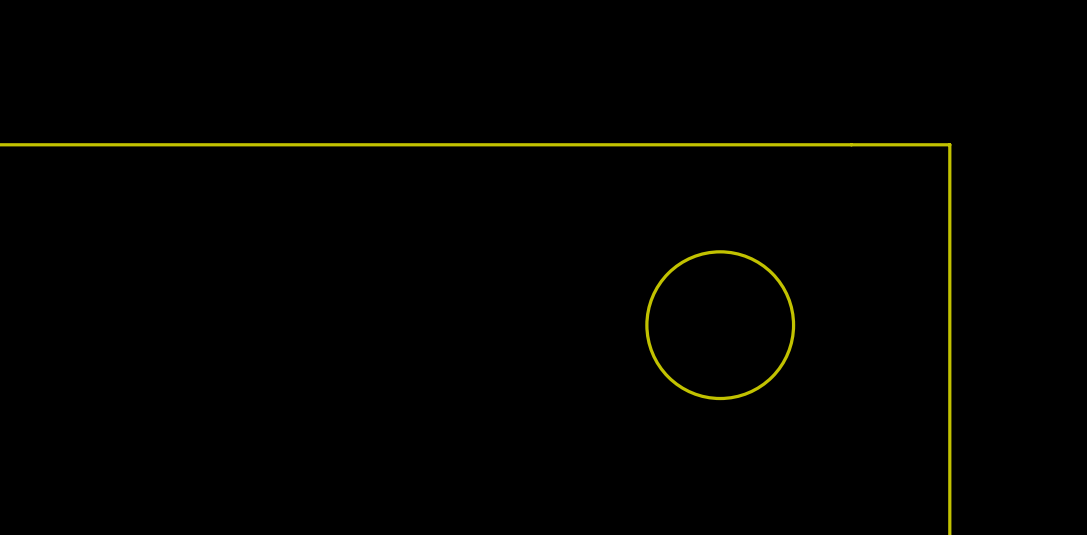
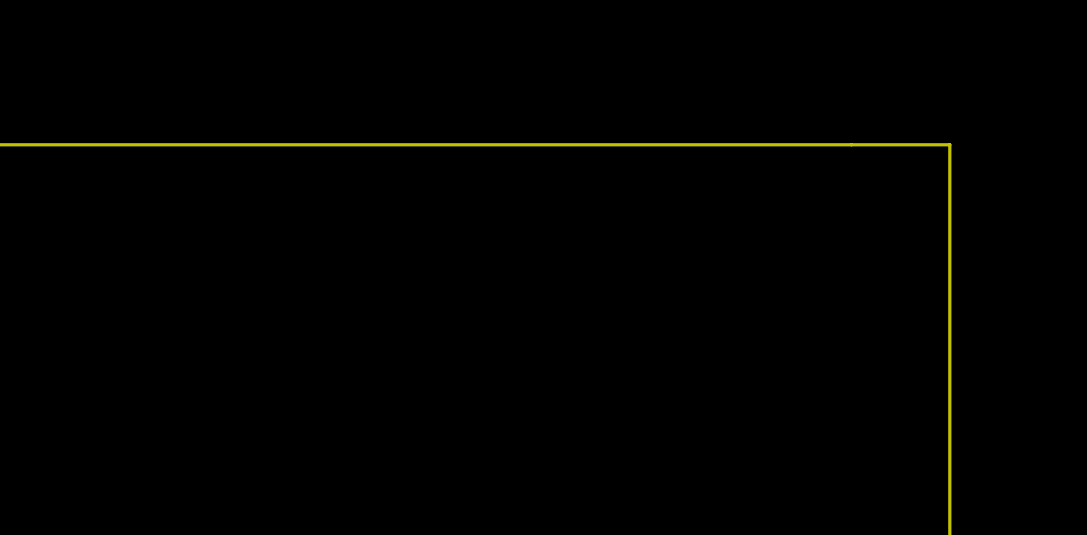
round board edge: [645, 250, 796, 401] -> none

